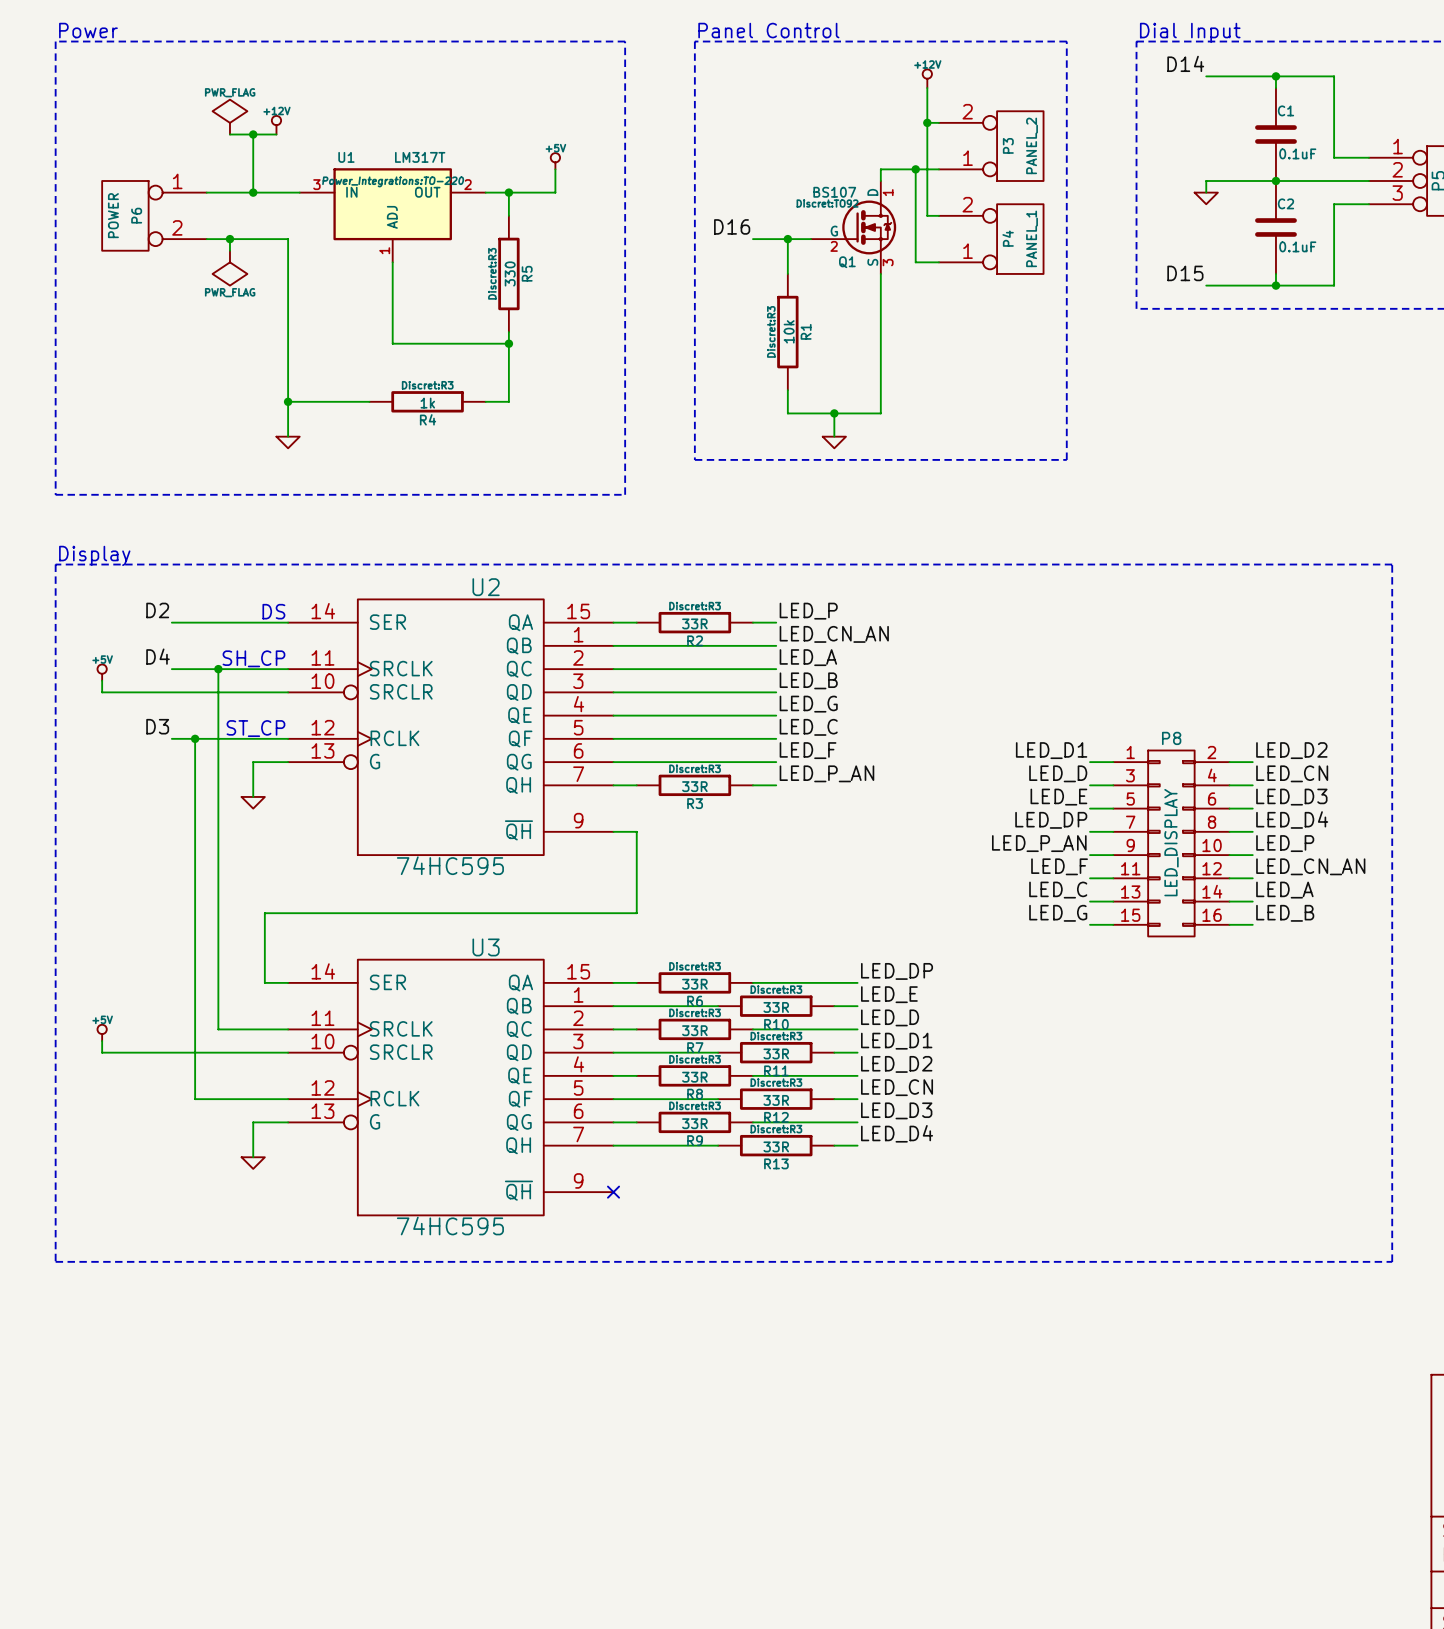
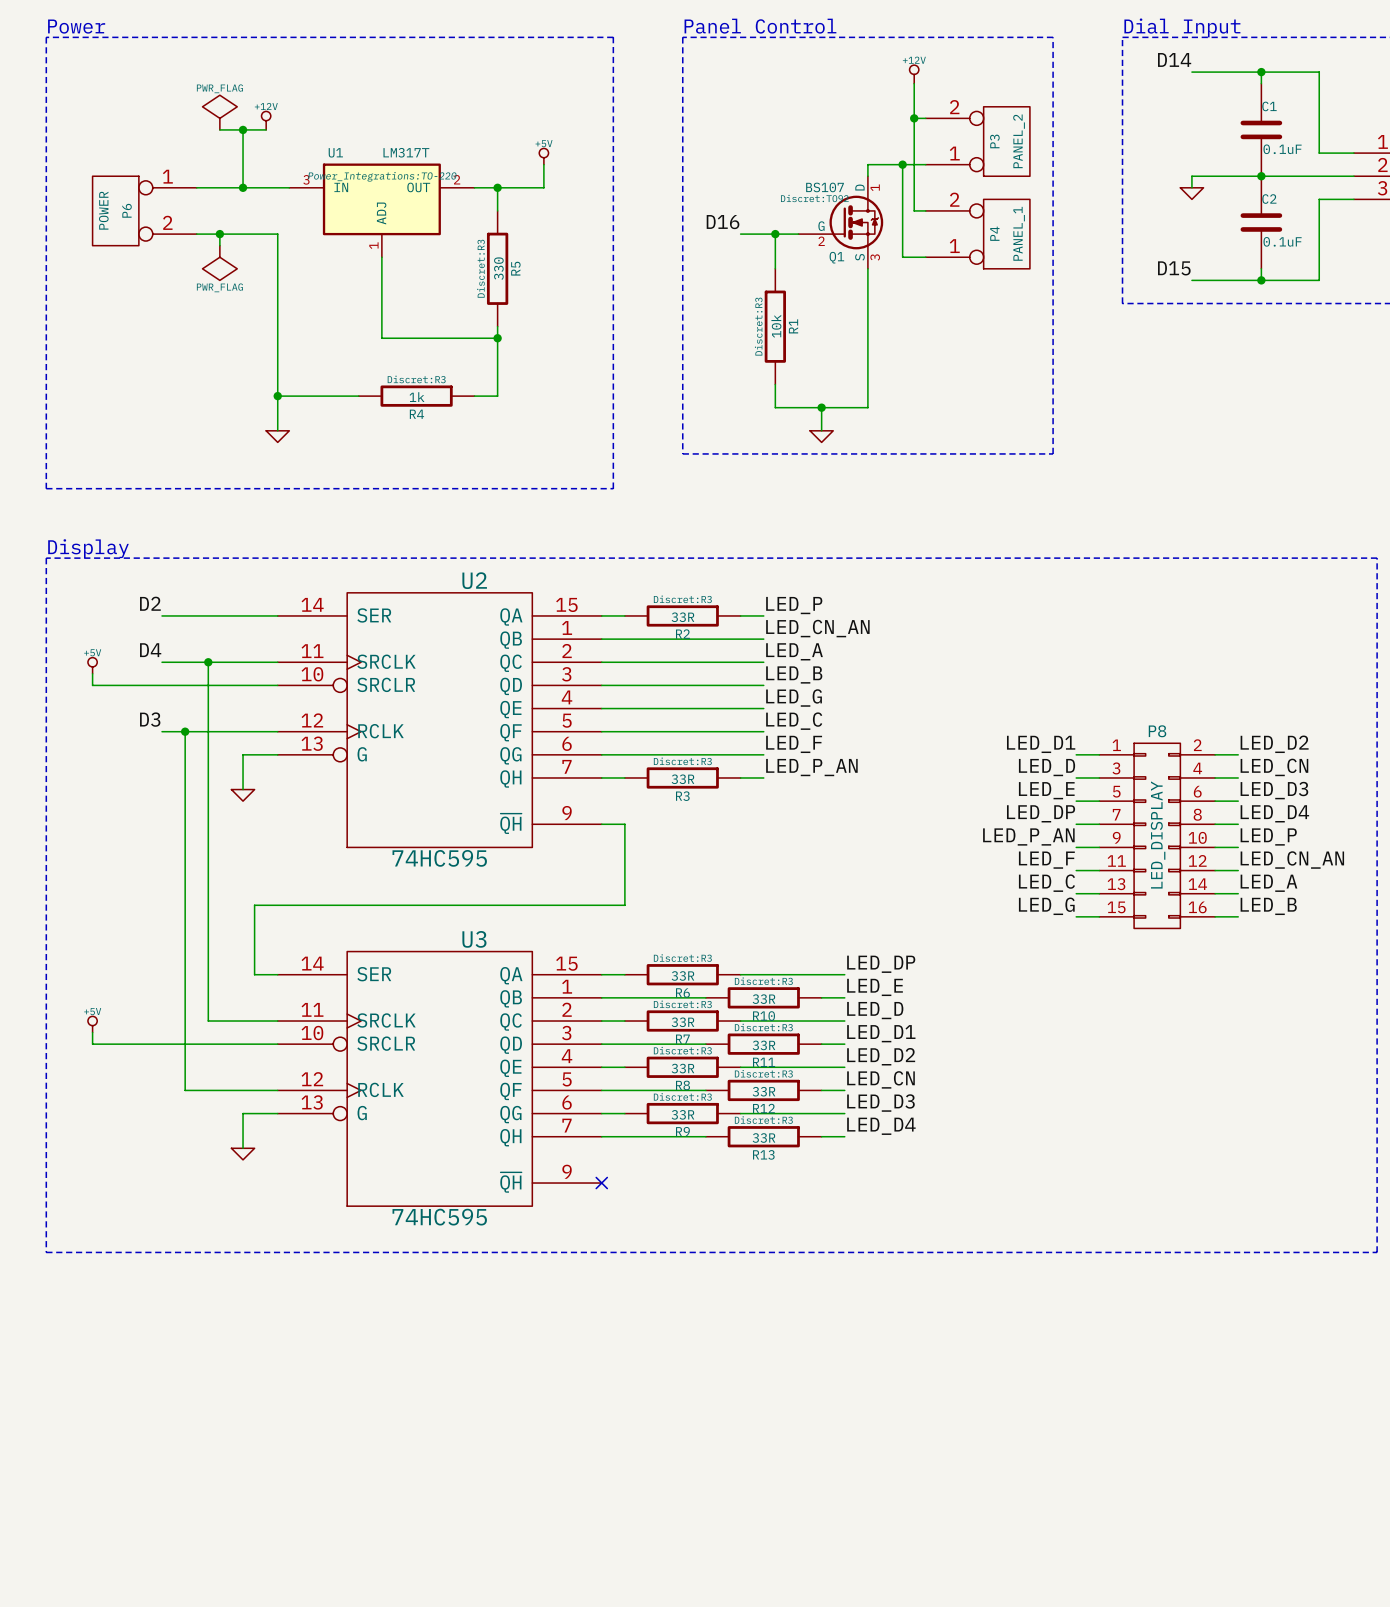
text: DS (273, 611) -> none
text: SH_CP (253, 658) -> none
text: ST_CP (255, 728) -> none

